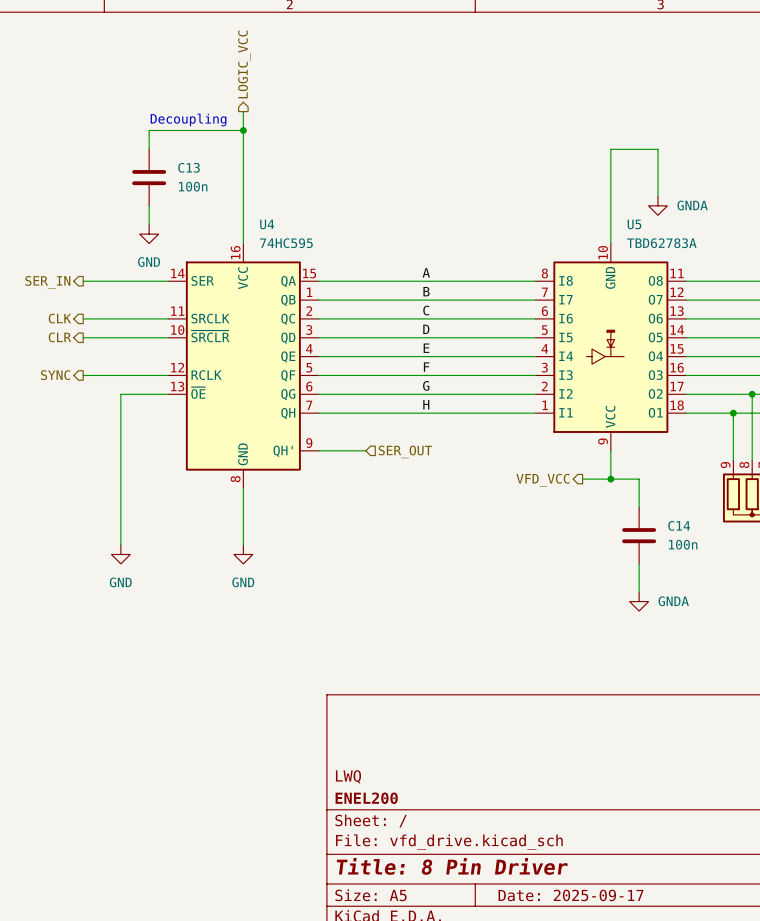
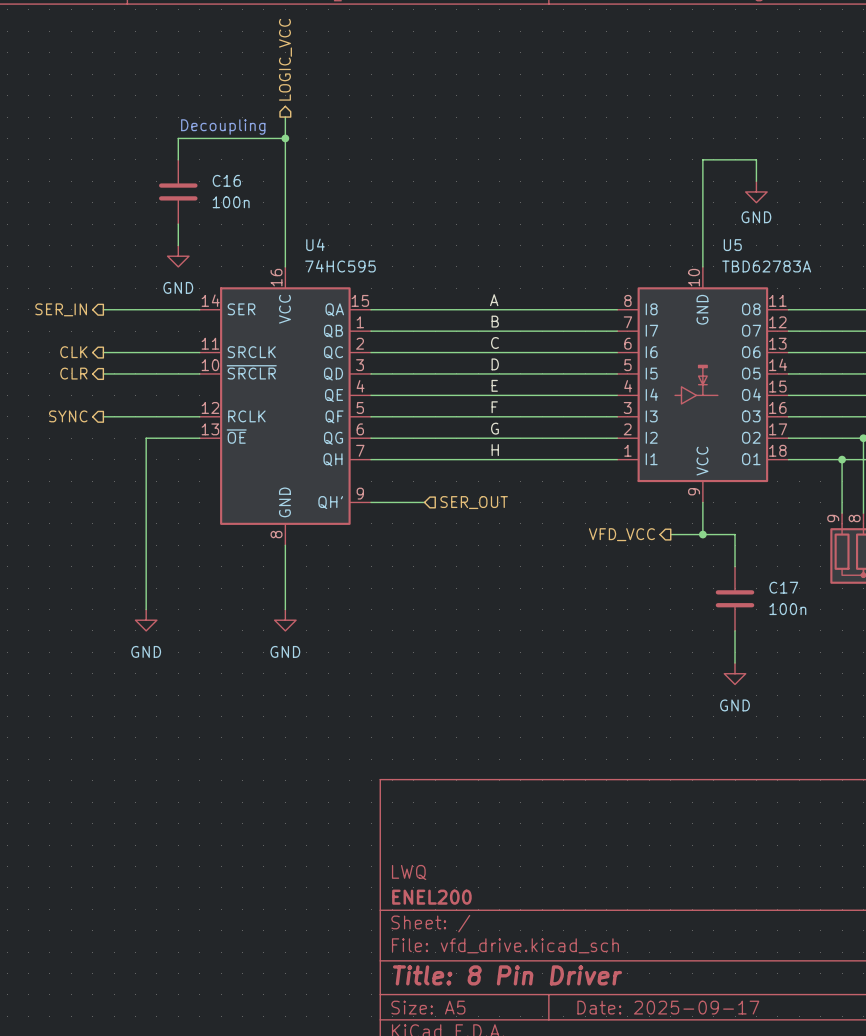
C13 name: C13 (189, 167) -> C16 (226, 180)
wire: (657, 168) (657, 196) -> none
power symbol: none -> GND (756, 191)
power symbol: GNDA (657, 205) -> none
C14 name: C14 (679, 525) -> C17 (783, 587)
power symbol: GNDA (639, 601) -> GND (735, 673)

